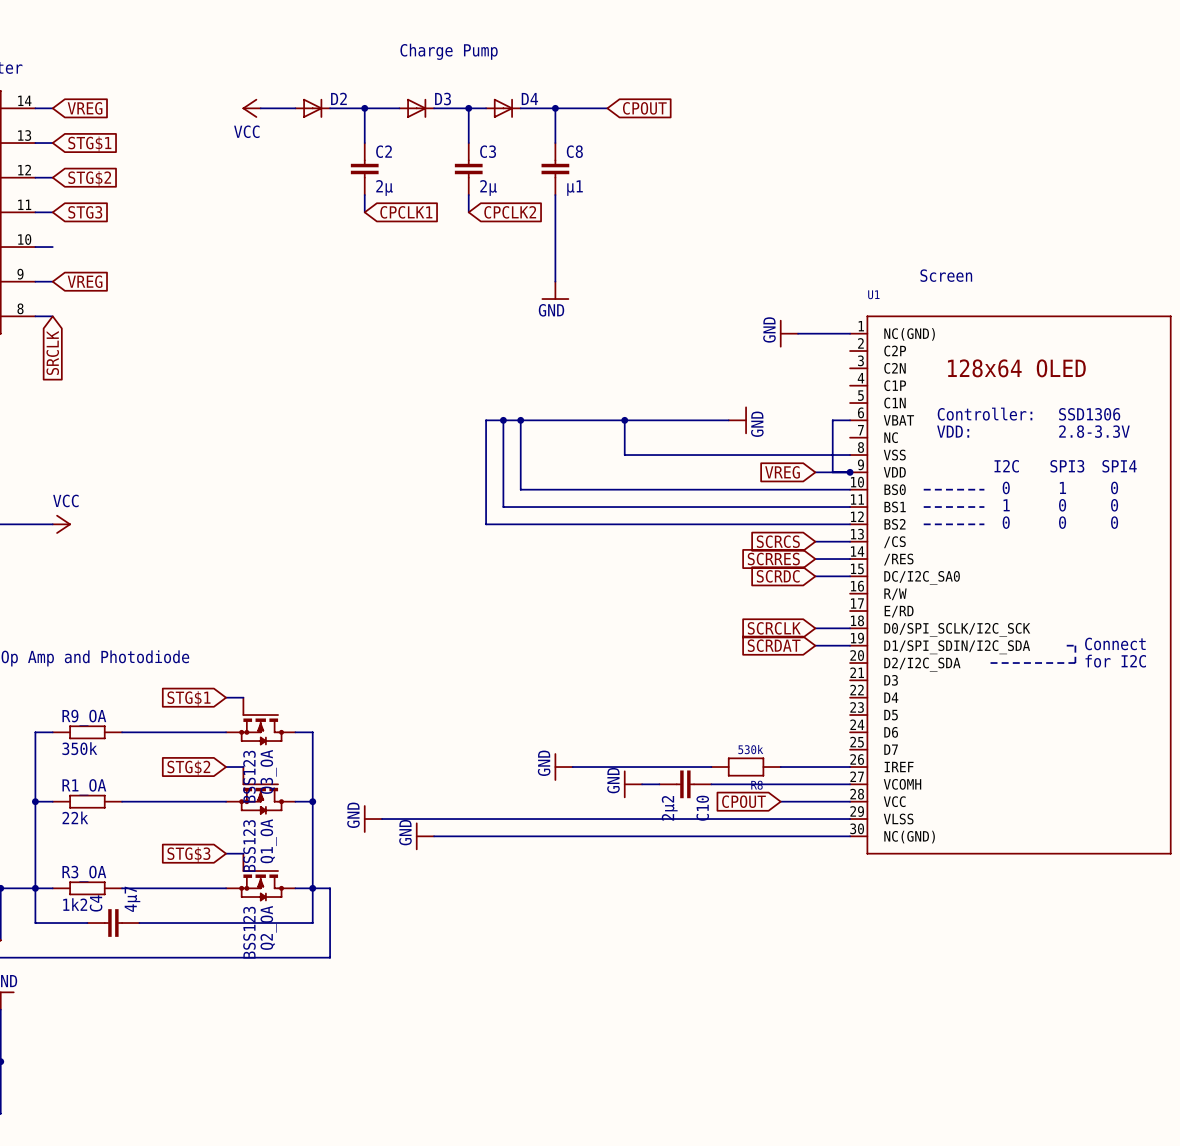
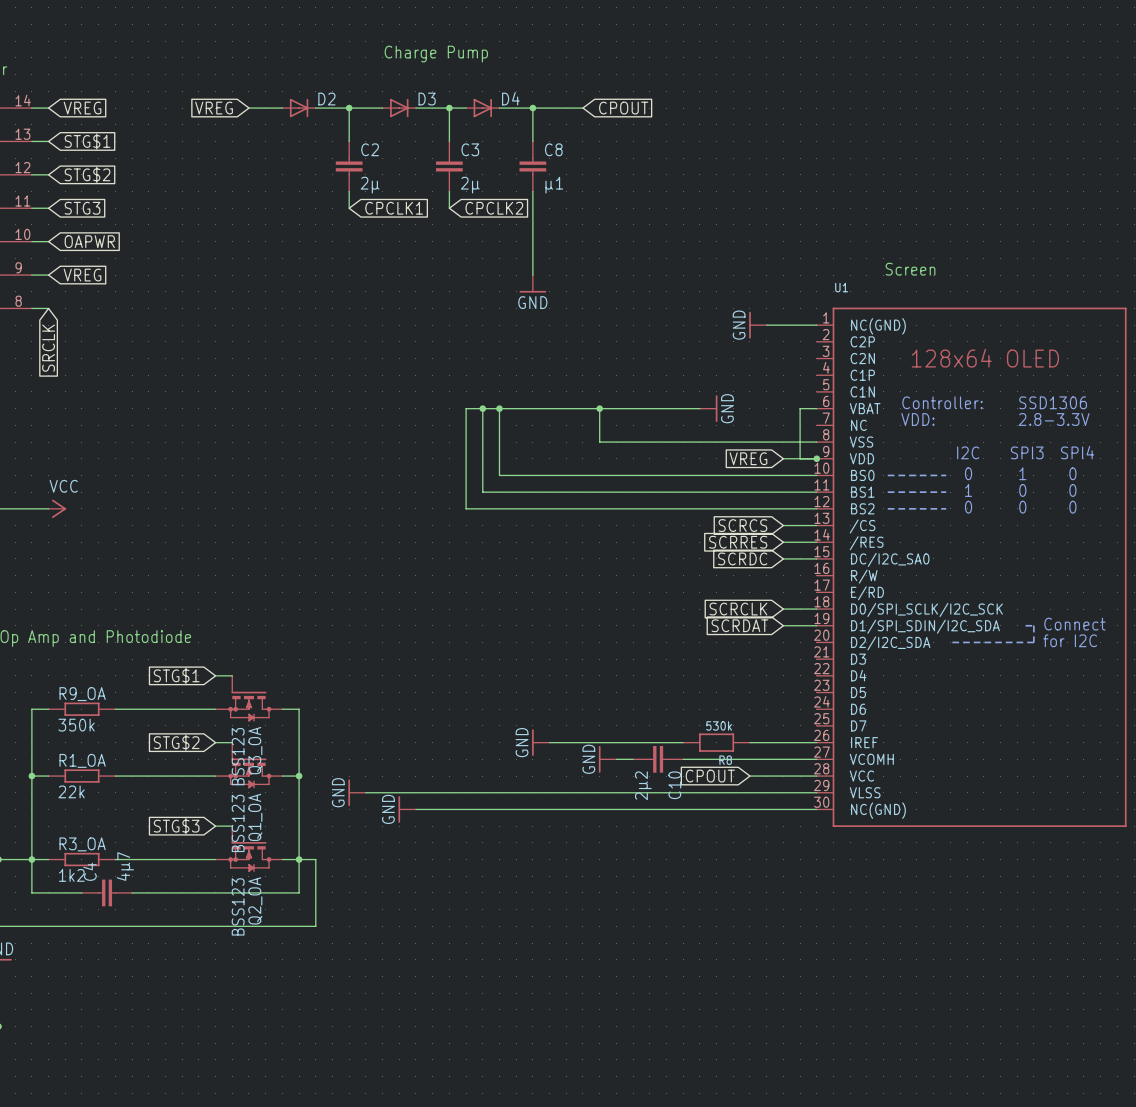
global label: none -> VREG (214, 108)
power symbol: VCC (251, 108) -> none
global label: none -> OAPWR (89, 241)

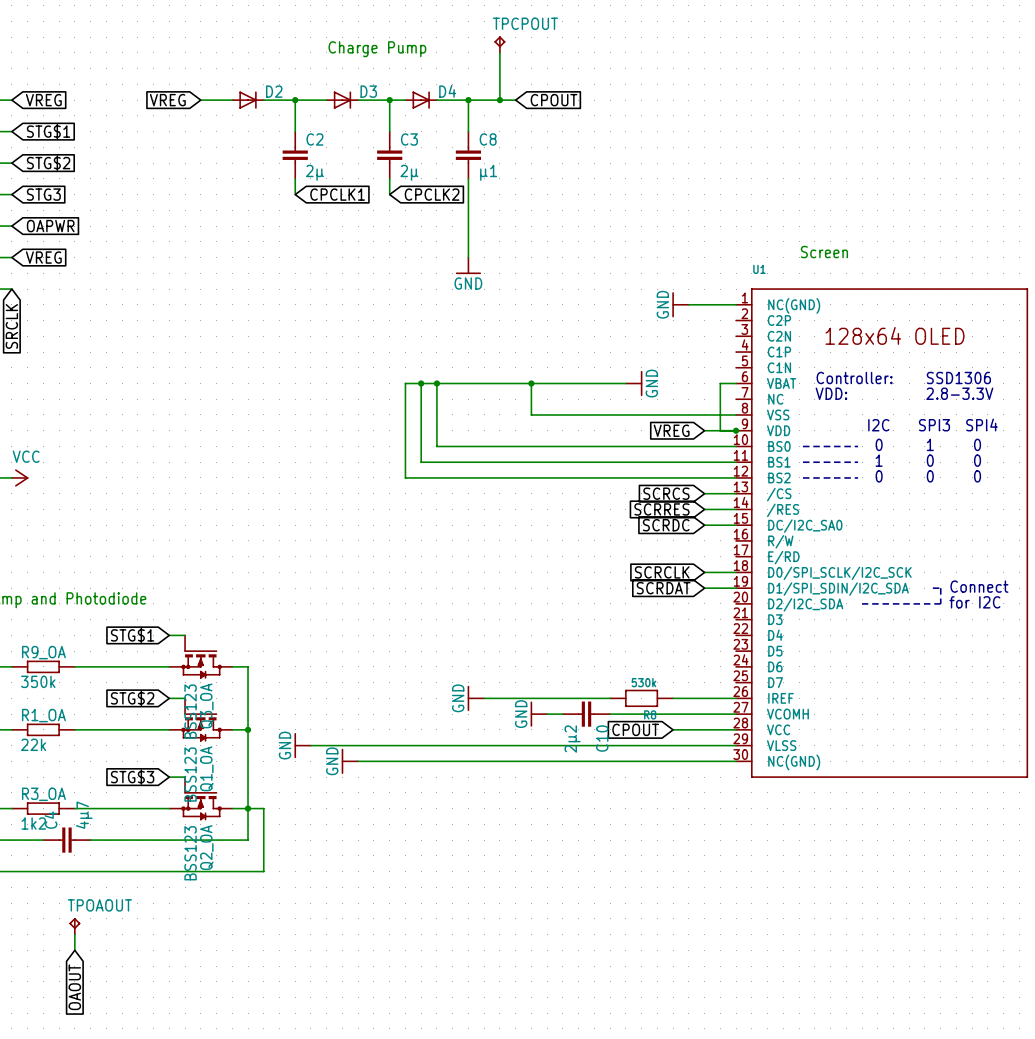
TPCPOUT: none -> (499, 44)
wire: none -> (499, 52) (499, 100)
junction: none -> (499, 100)
TPOAOUT: none -> (74, 926)
wire: none -> (74, 934) (74, 950)
global label: none -> OAOUT (74, 987)

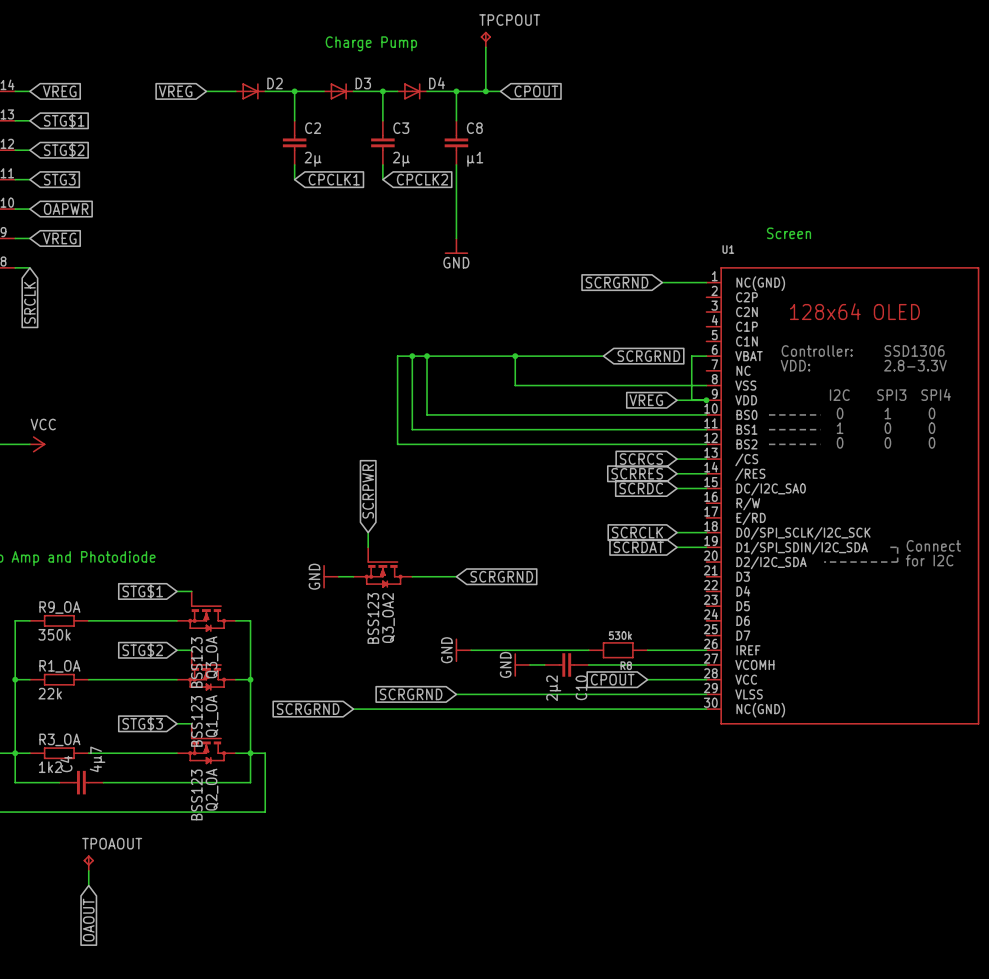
global label: none -> SCRGRND (617, 282)
power symbol: GND (680, 304) -> none
power symbol: GND (634, 383) -> none
global label: none -> SCRGRND (648, 356)
global label: none -> SCRPWR (368, 491)
wire: none -> (368, 532) (368, 547)
Q3_OA2: none -> BSS123 (382, 567)
power symbol: none -> GND (331, 576)
wire: none -> (338, 576) (353, 576)
wire: none -> (412, 576) (456, 576)
global label: none -> SCRGRND (501, 576)
power symbol: GND (302, 745) -> none
wire: (310, 745) (468, 745) -> none
global label: none -> SCRGRND (411, 694)
global label: none -> SCRGRND (308, 709)
power symbol: GND (349, 761) -> none

